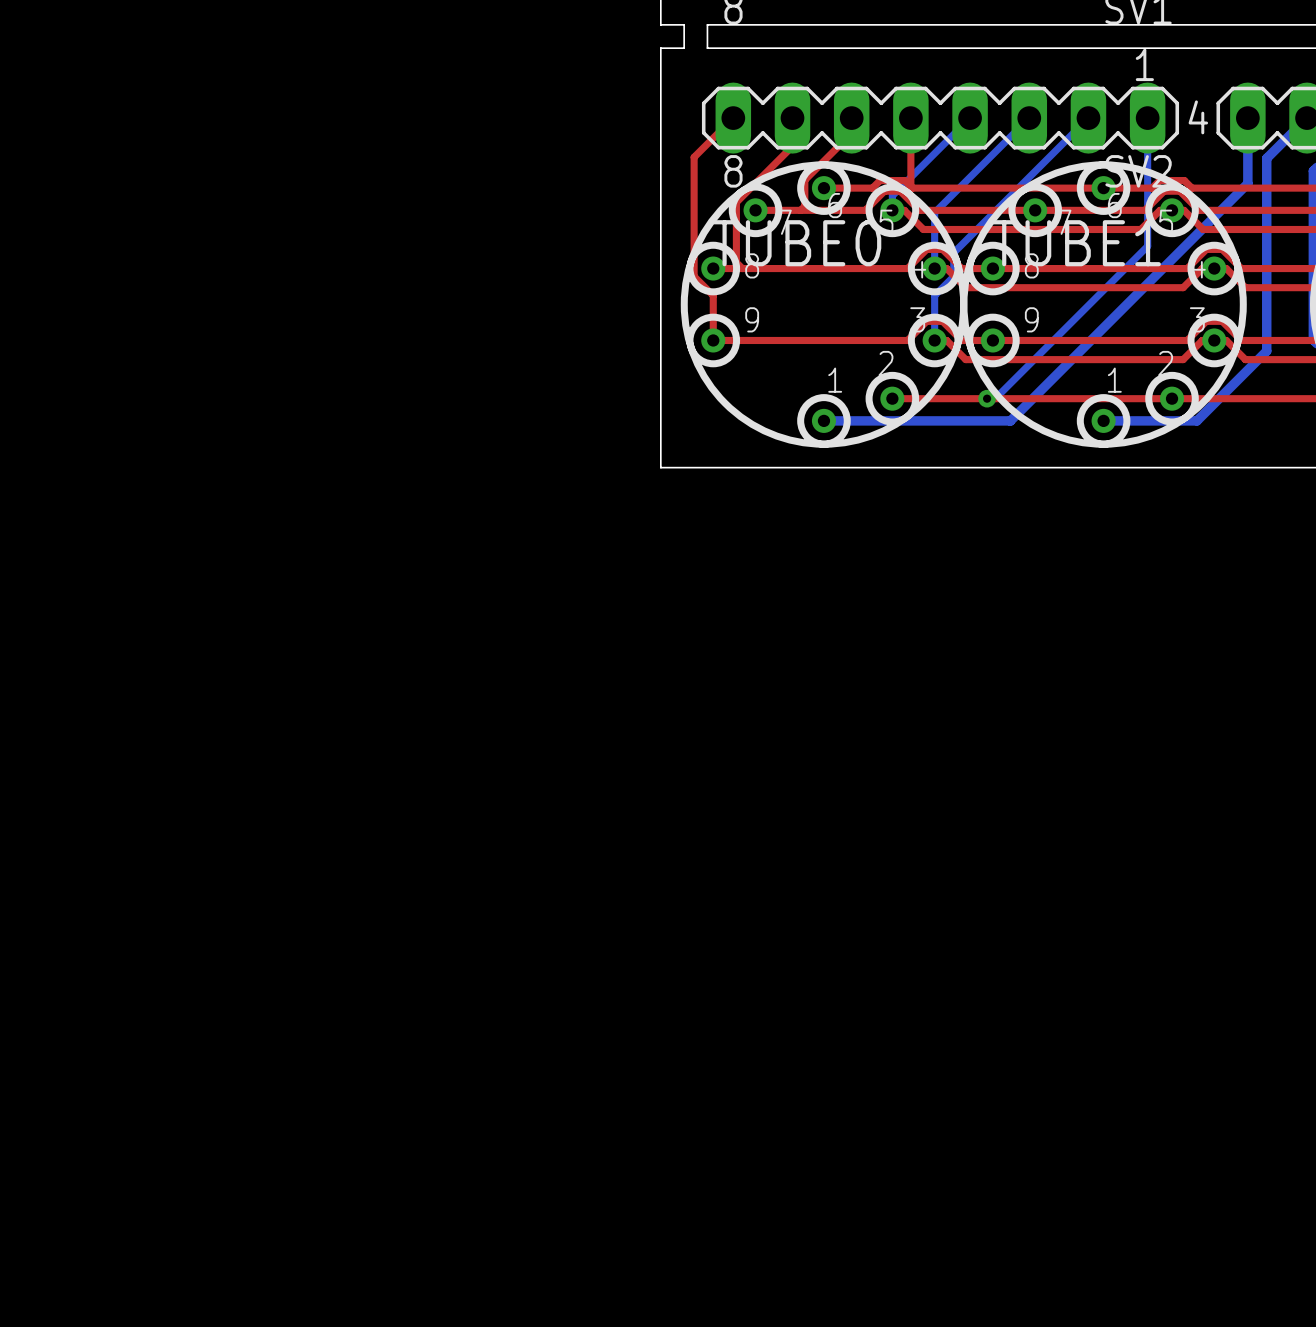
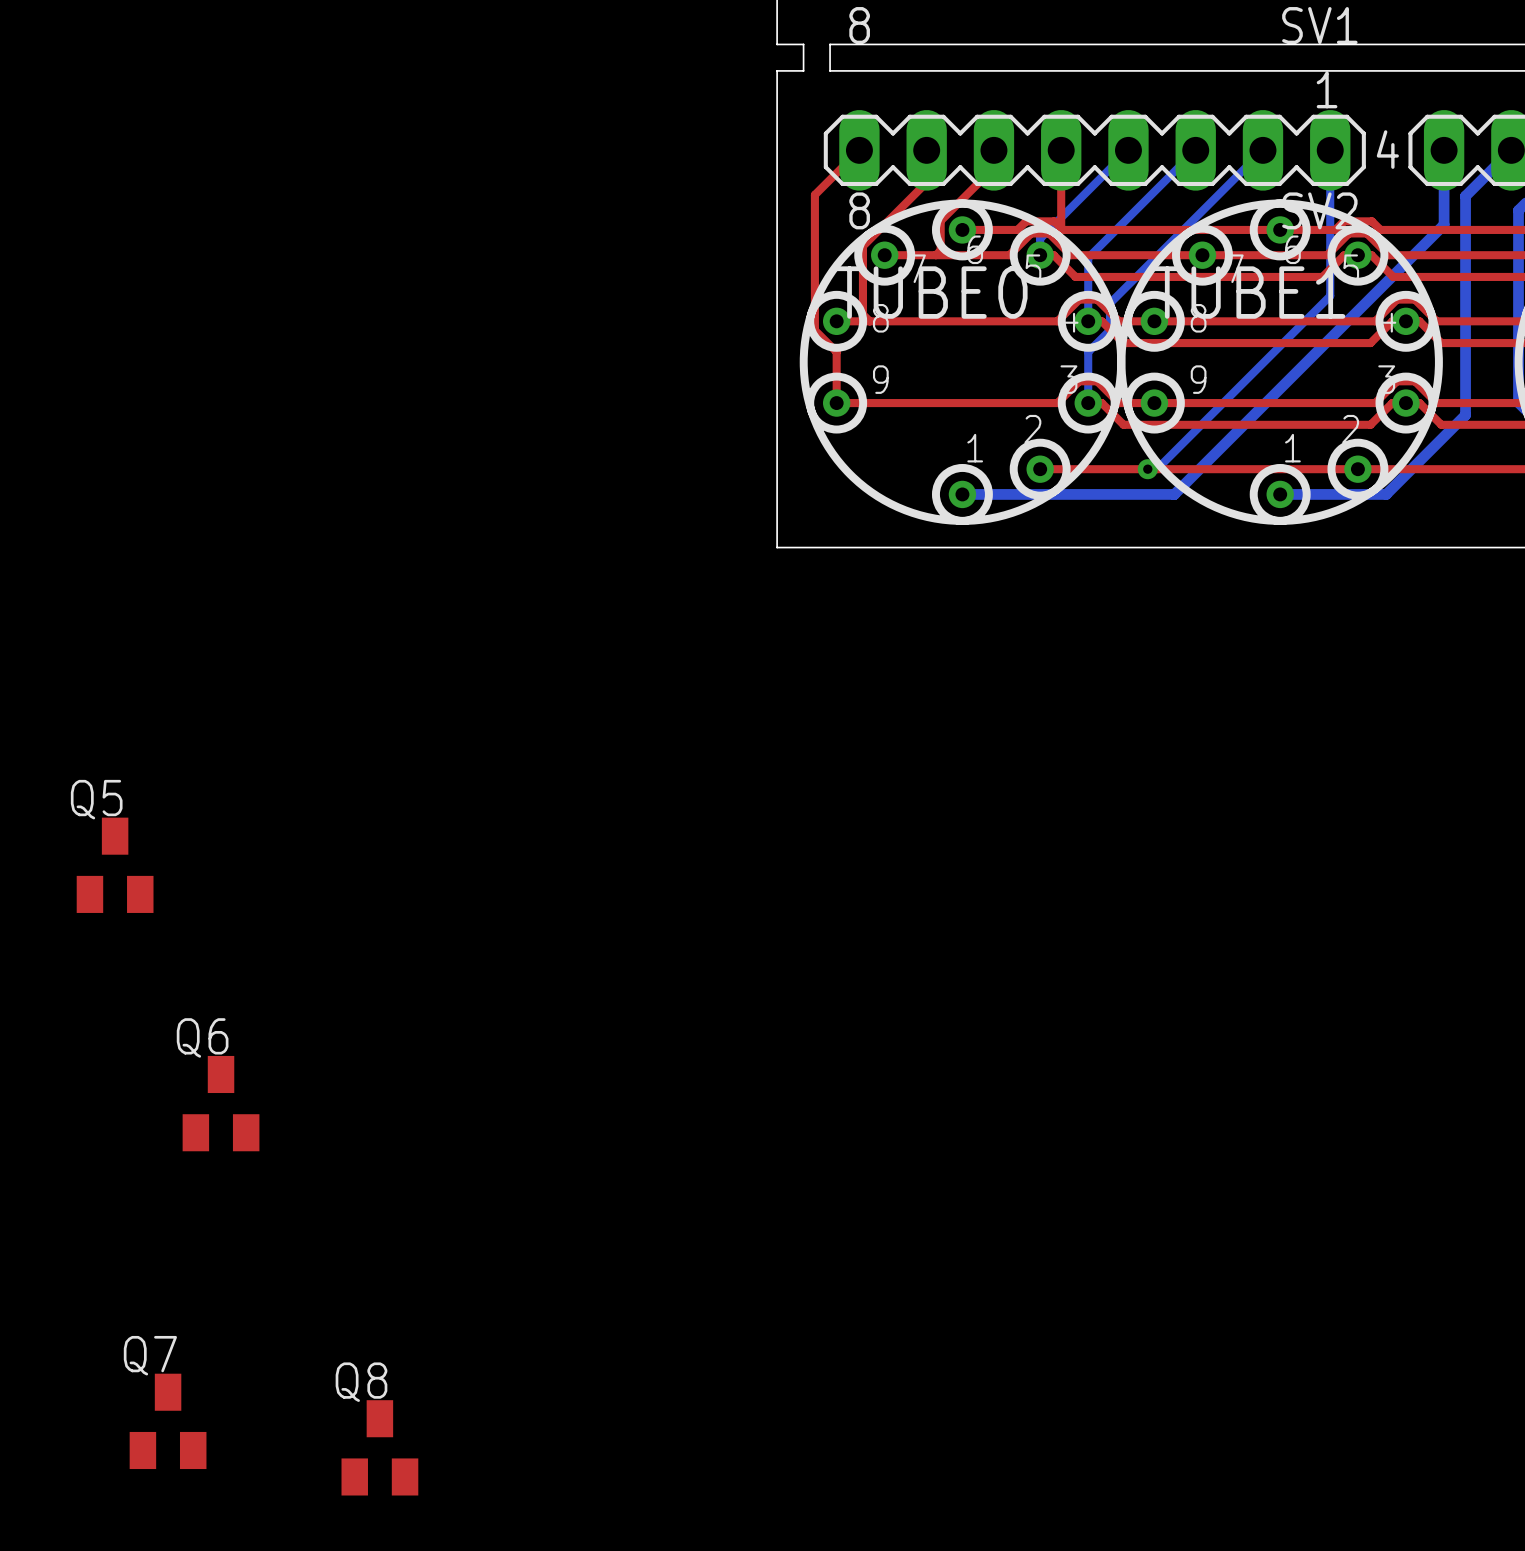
Q5: none -> (115, 865)
Q6: none -> (221, 1103)
Q7: none -> (168, 1421)
Q8: none -> (379, 1447)

